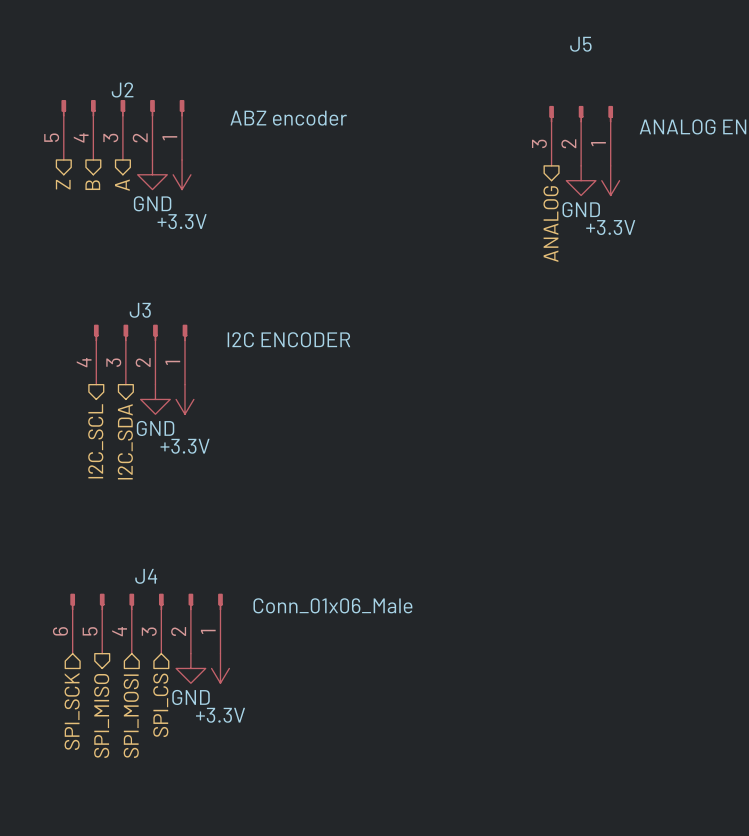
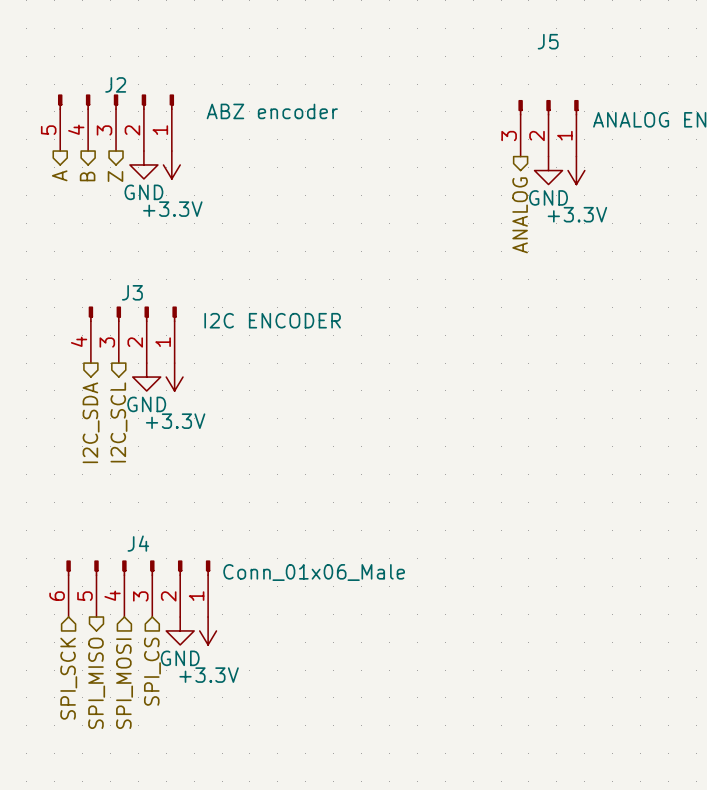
hierarchical label: Z (63, 184) -> A (59, 175)
hierarchical label: A (122, 185) -> Z (115, 176)
hierarchical label: I2C_SCL (95, 441) -> I2C_SDA (91, 422)
hierarchical label: I2C_SDA (125, 441) -> I2C_SCL (118, 422)

